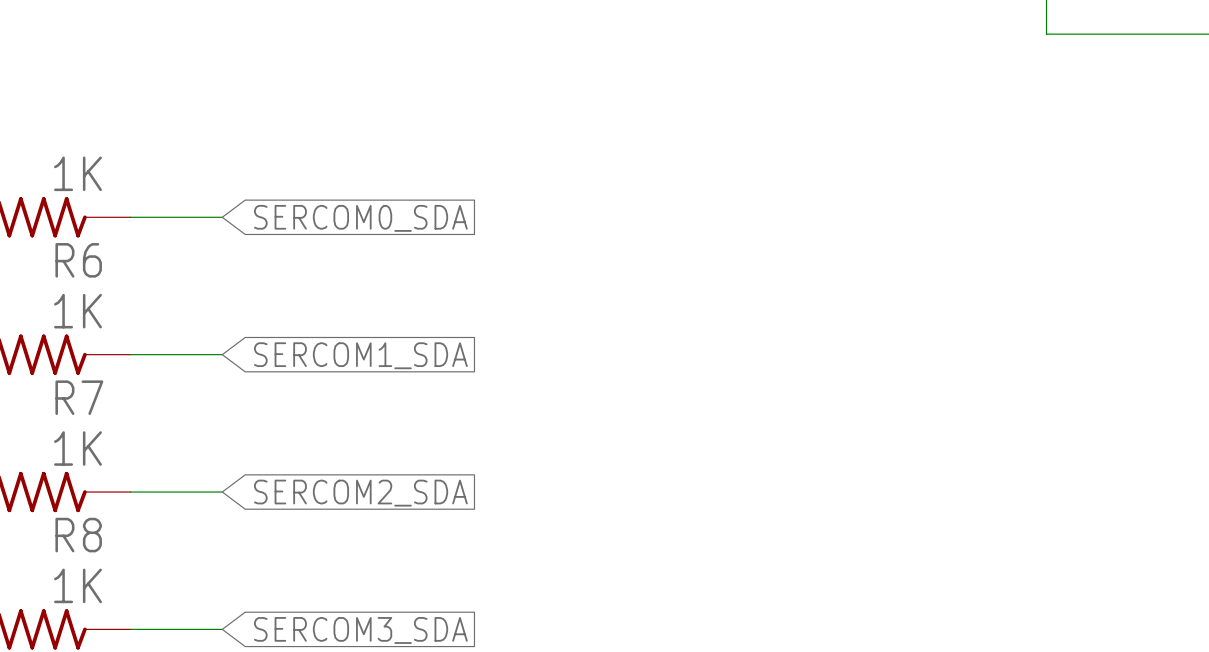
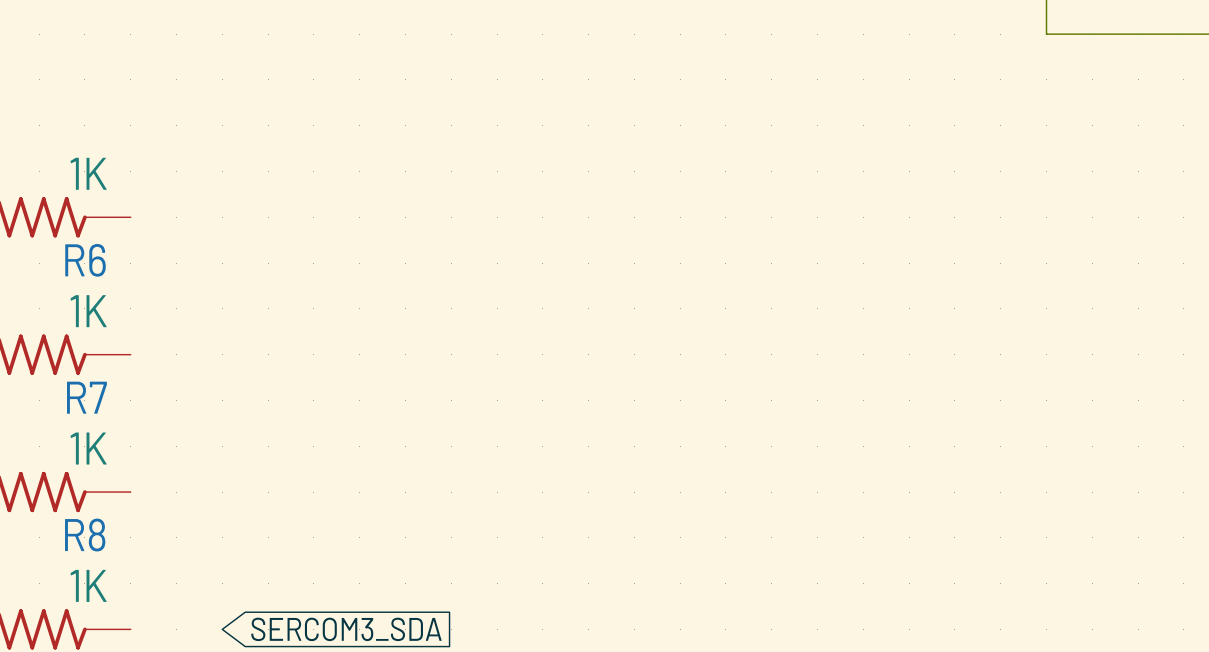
wire: (130, 217) (222, 217) -> none
global label: SERCOM0_SDA (360, 218) -> none
wire: (130, 354) (222, 354) -> none
global label: SERCOM1_SDA (360, 355) -> none
wire: (130, 492) (222, 492) -> none
global label: SERCOM2_SDA (360, 493) -> none
wire: (130, 629) (222, 629) -> none

